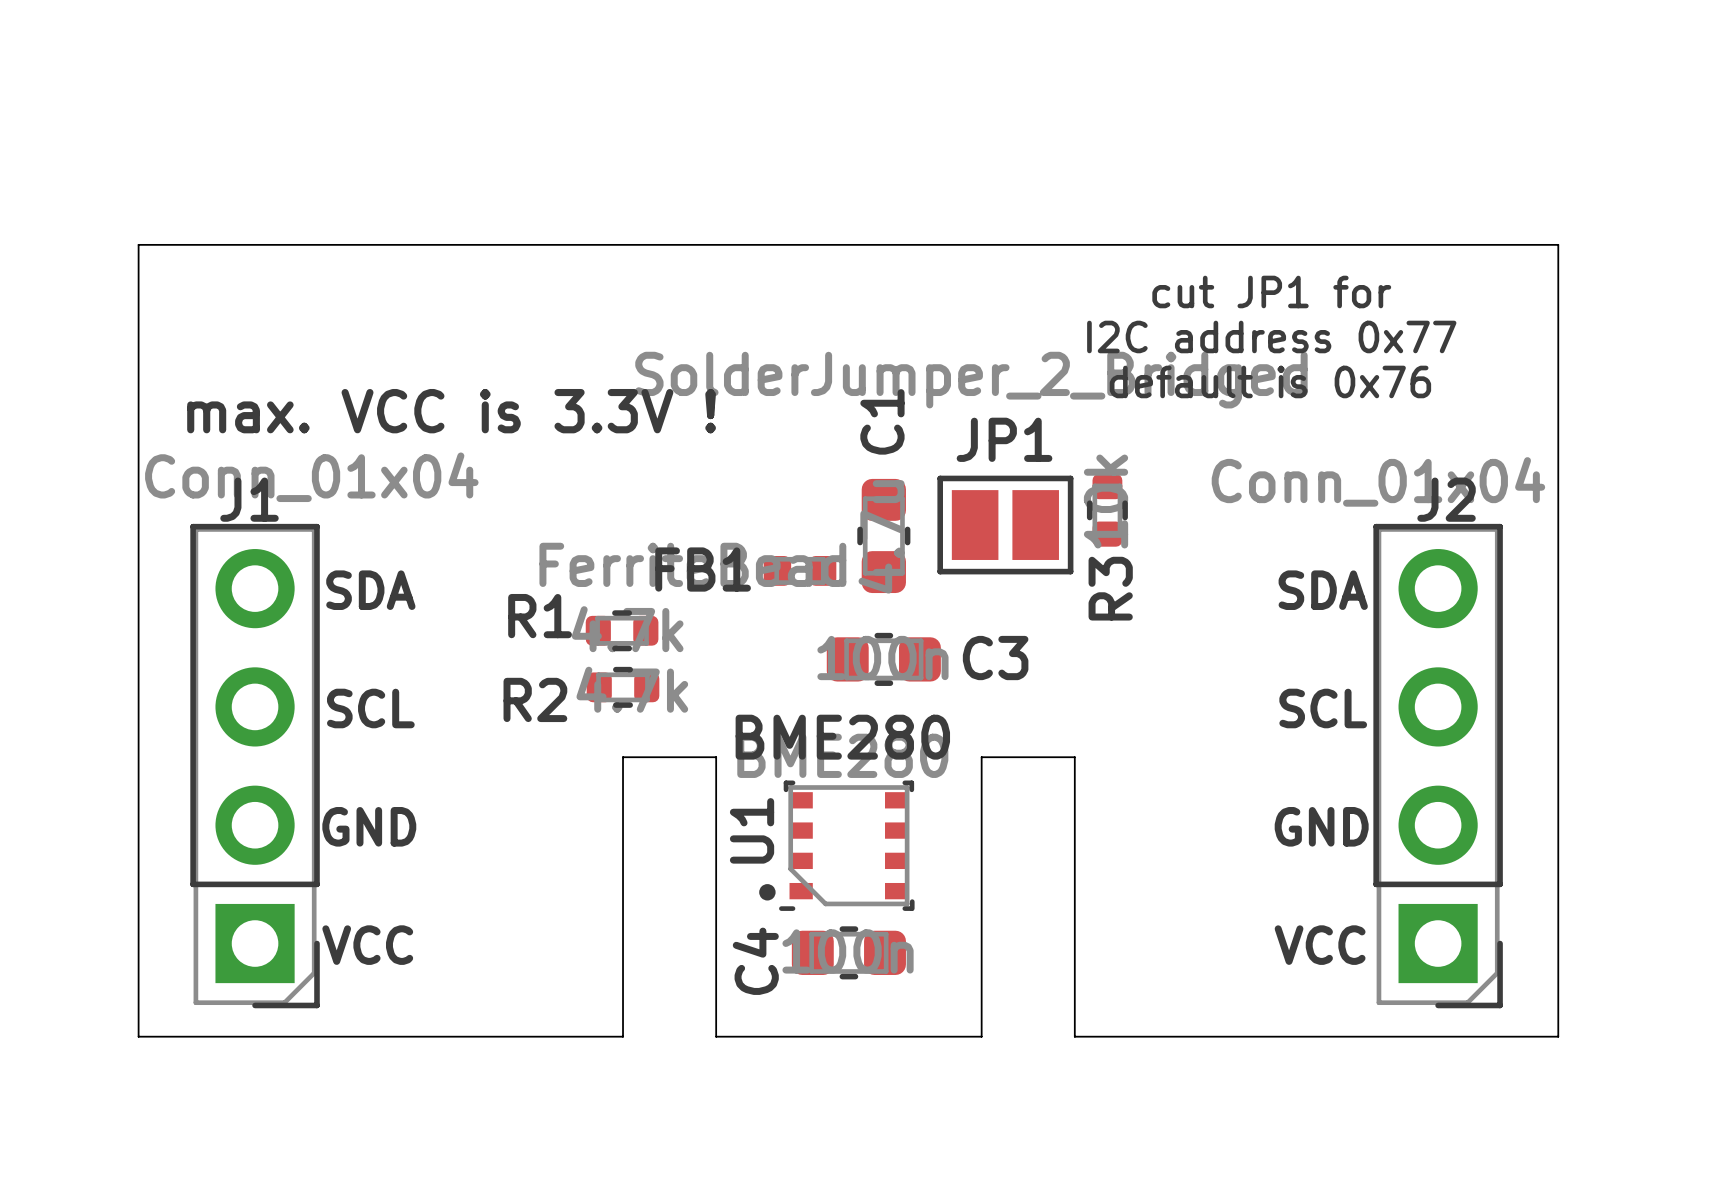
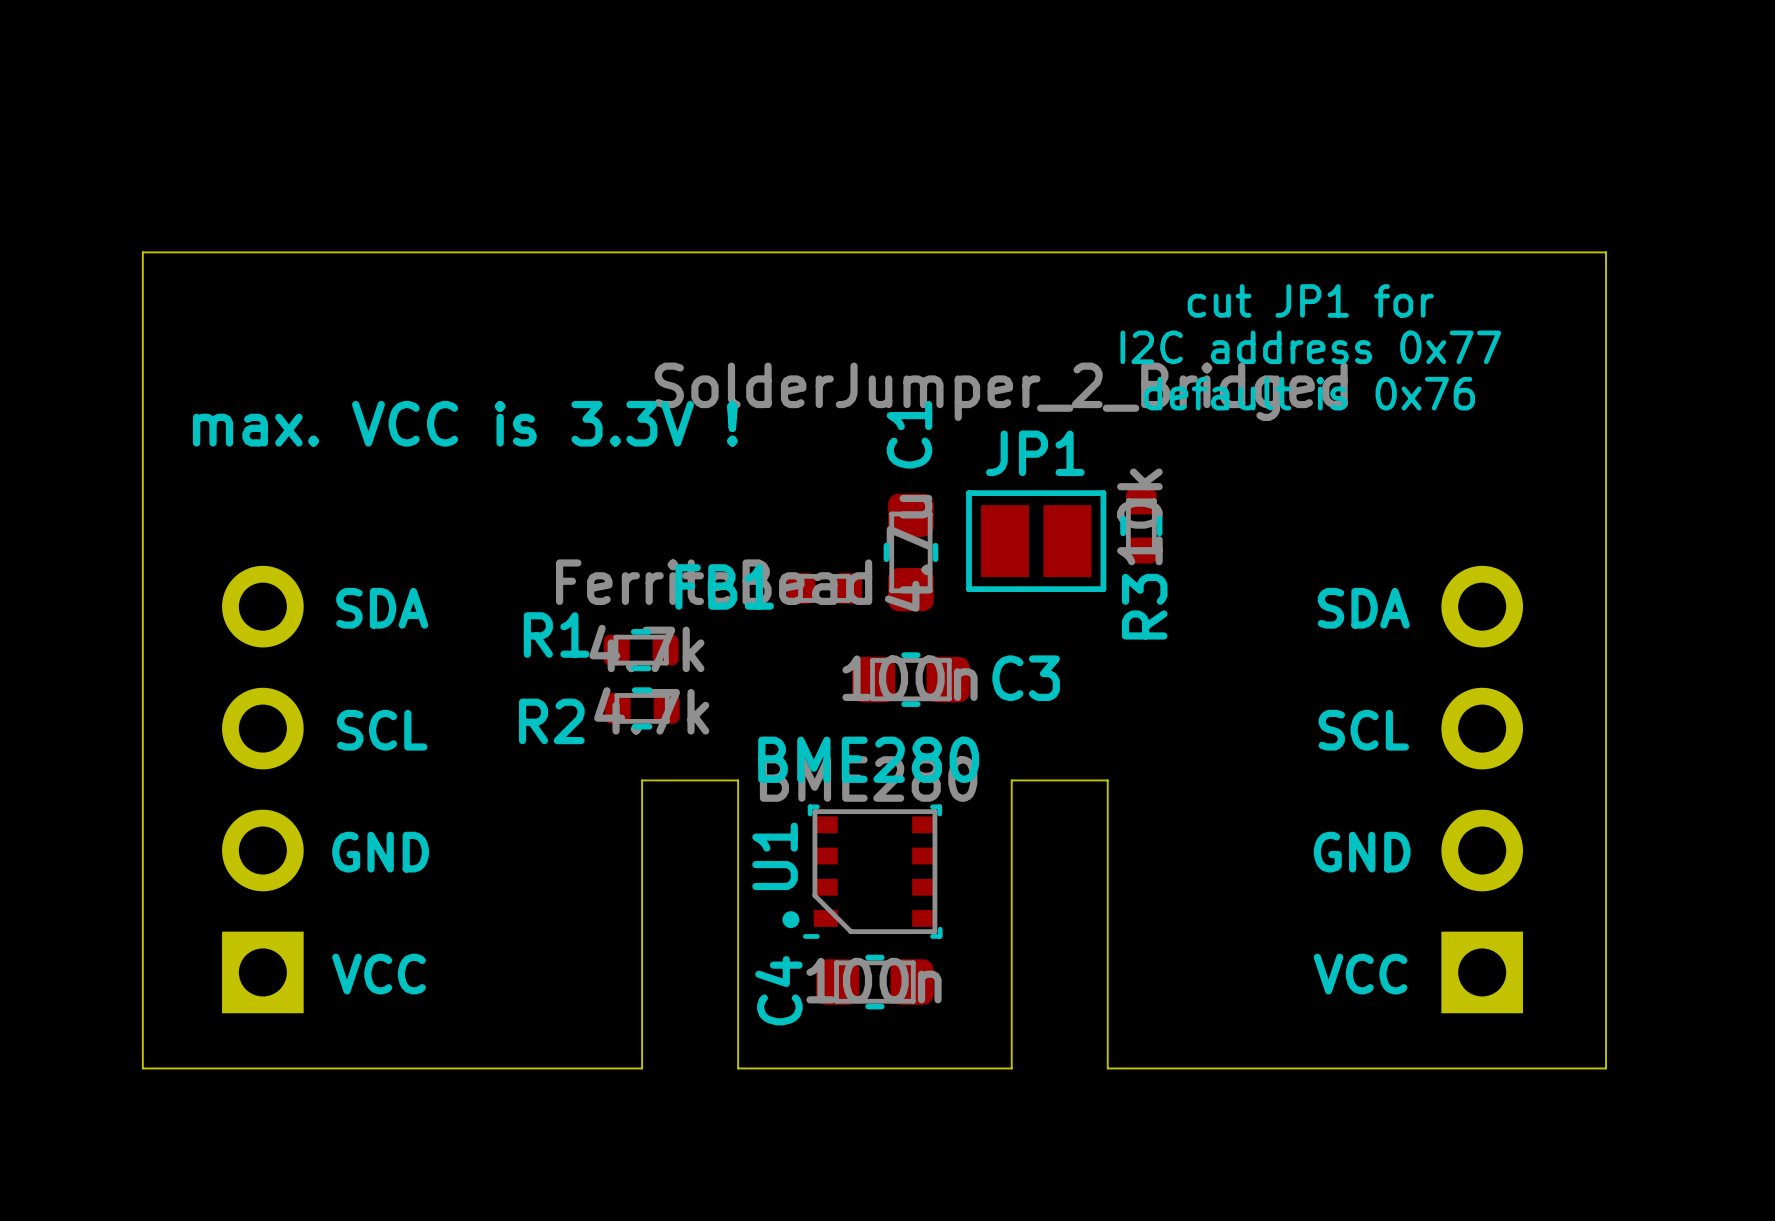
J1 side: top (255, 766) -> bottom (262, 789)
J2 side: top (1438, 766) -> bottom (1482, 789)

